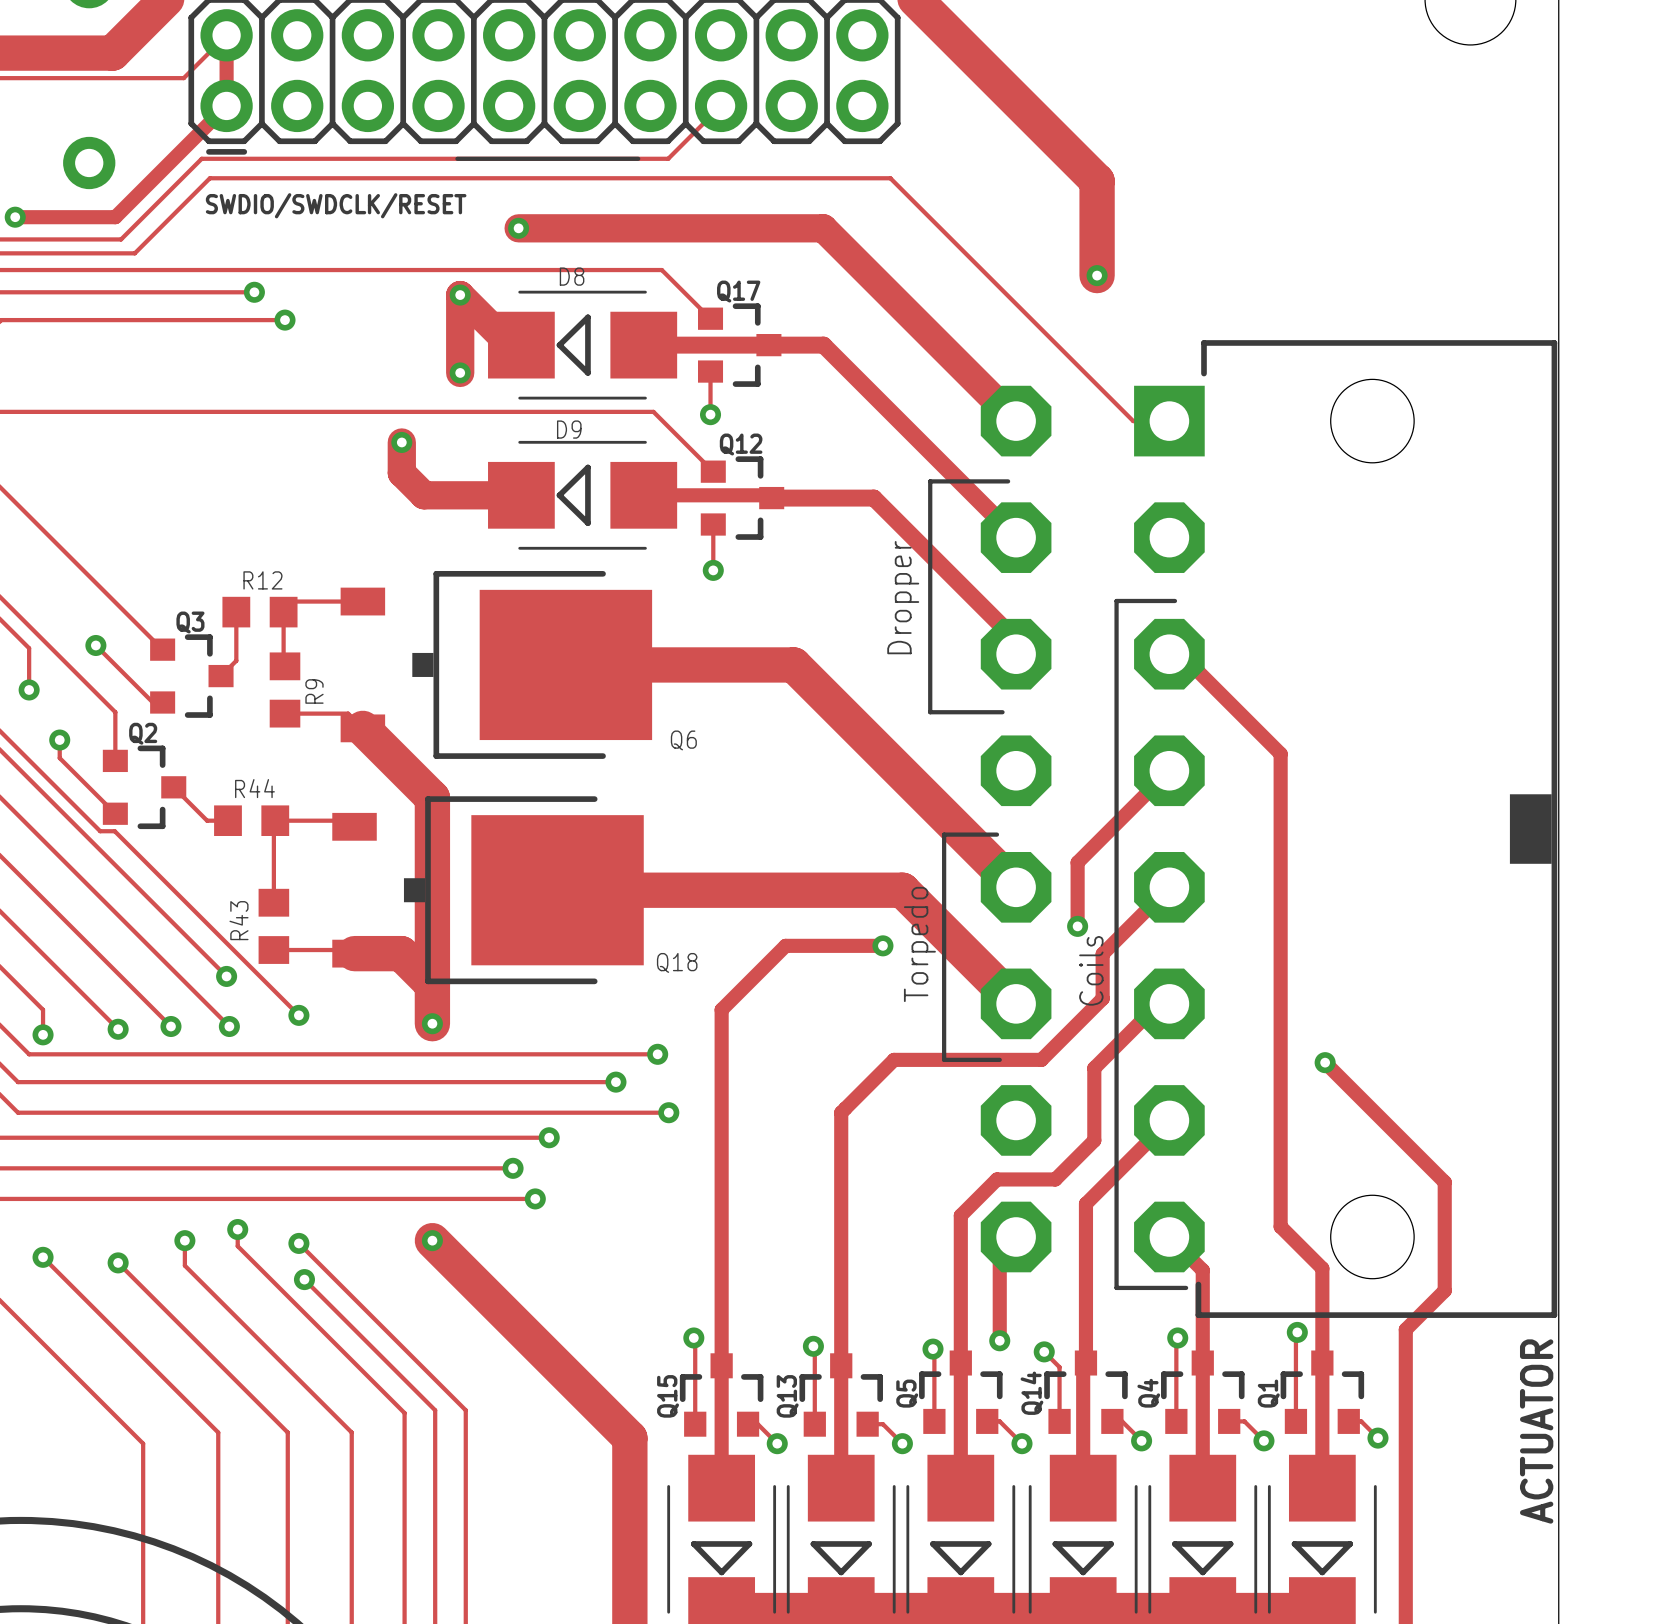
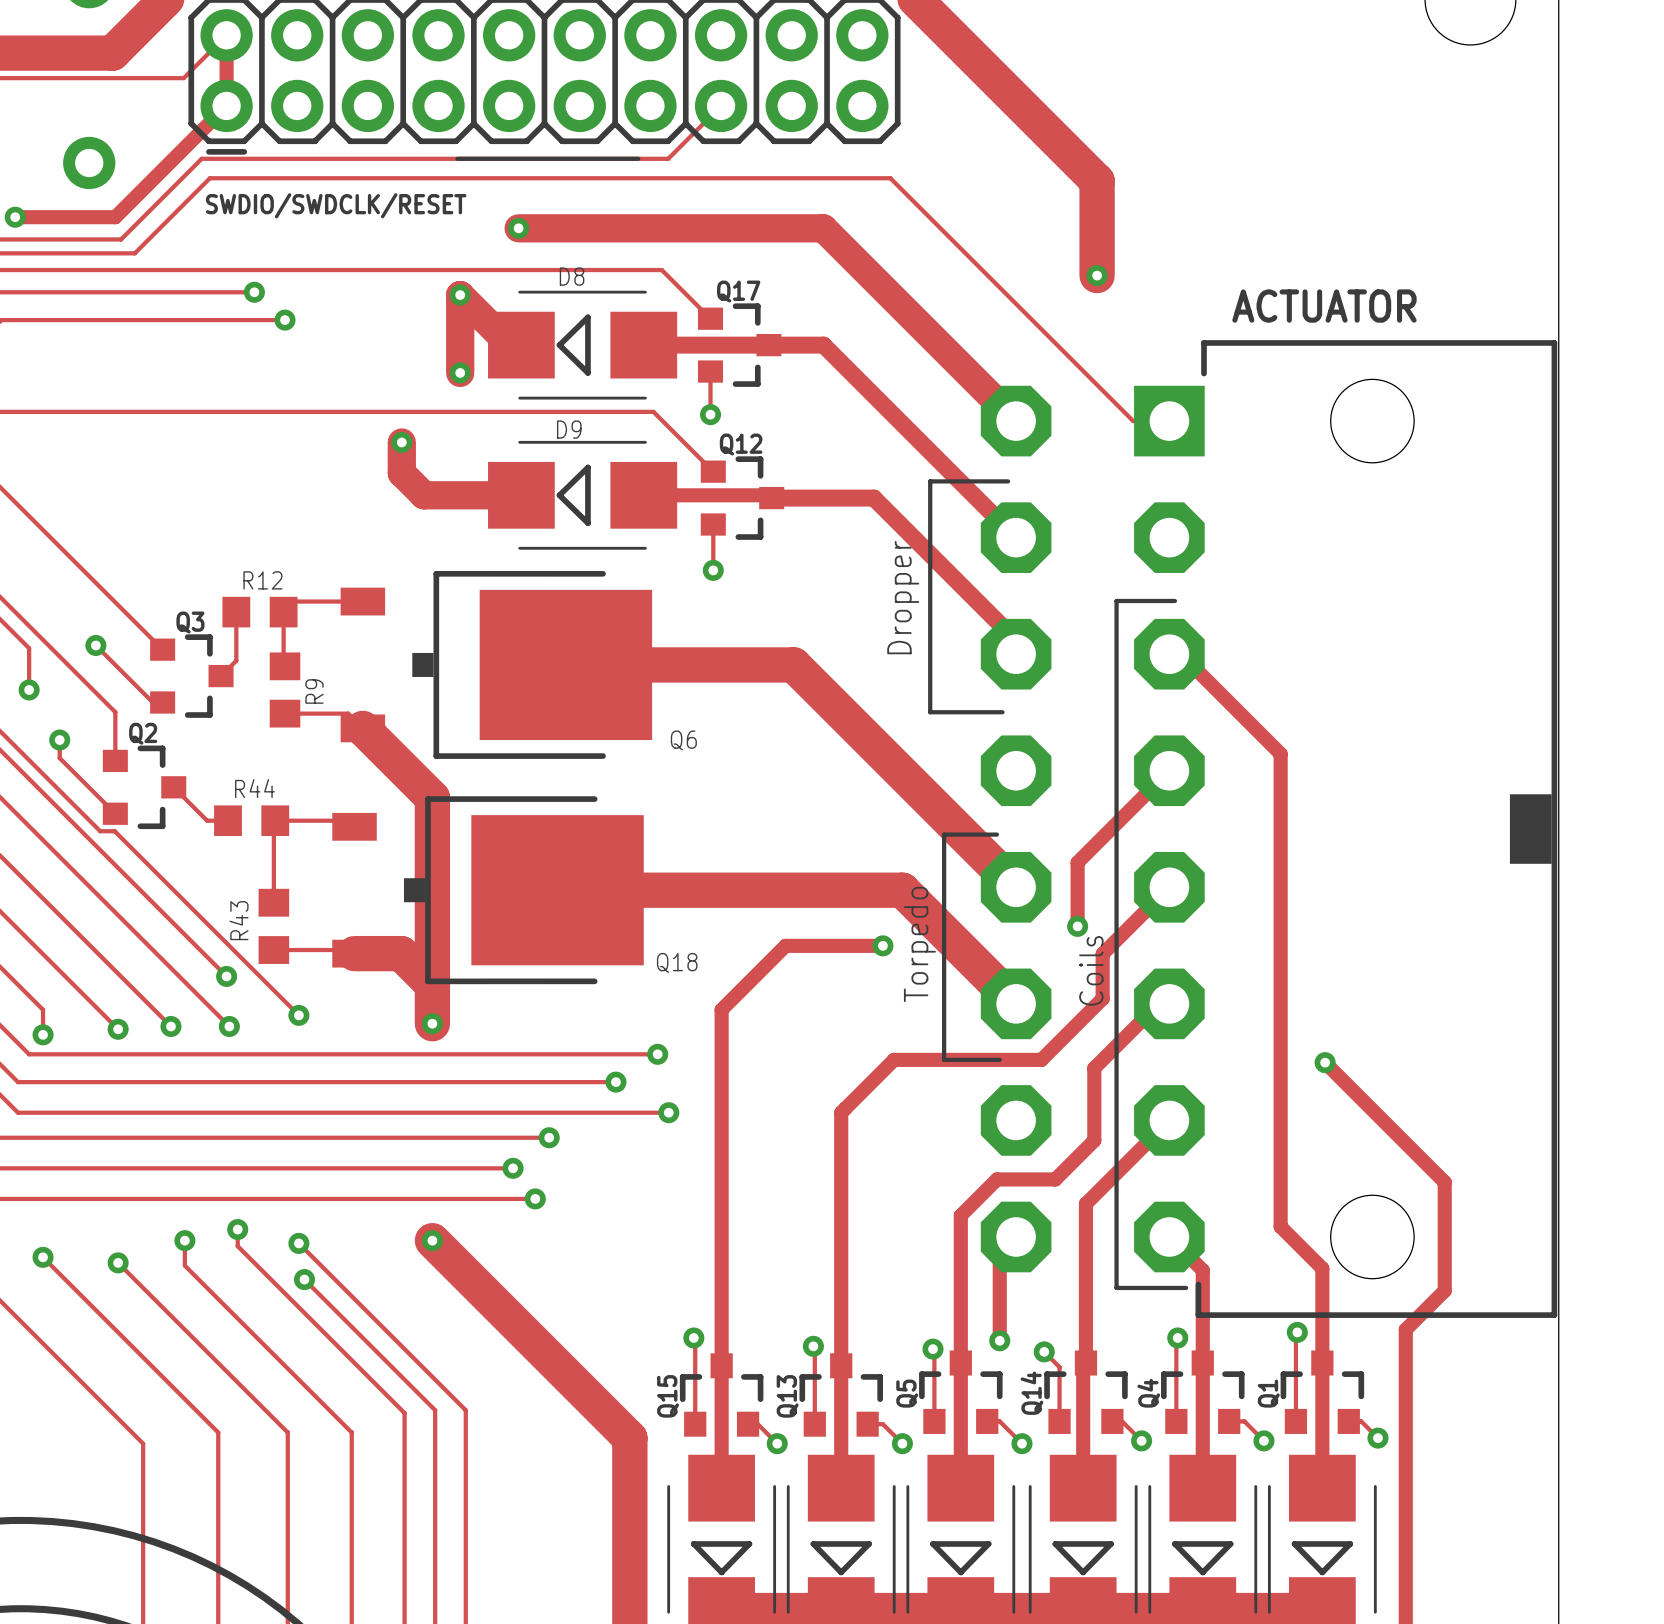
ACTUATOR name rotation: 0° (1536, 1431) -> 90° clockwise (1324, 306)
ACTUATOR name position: ACTUATOR (1536, 1431) -> ACTUATOR (1324, 306)

